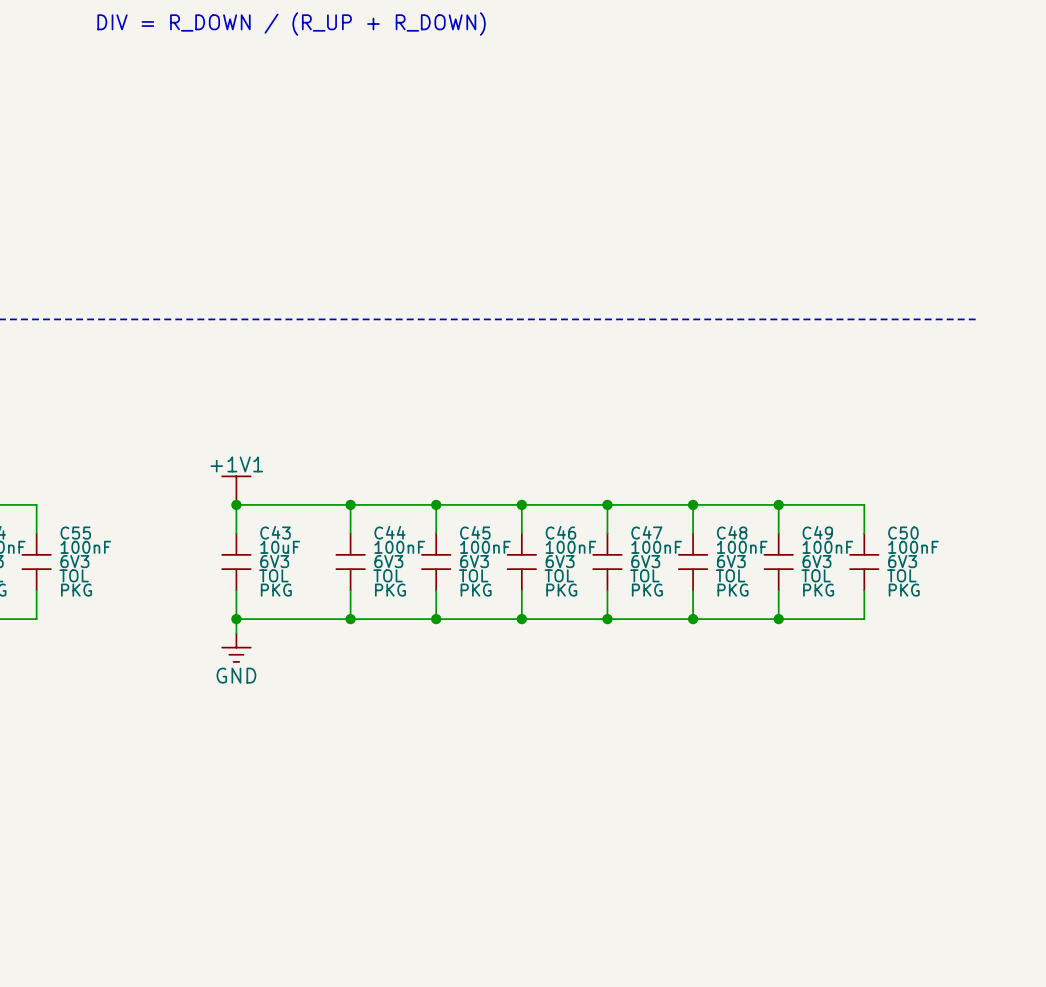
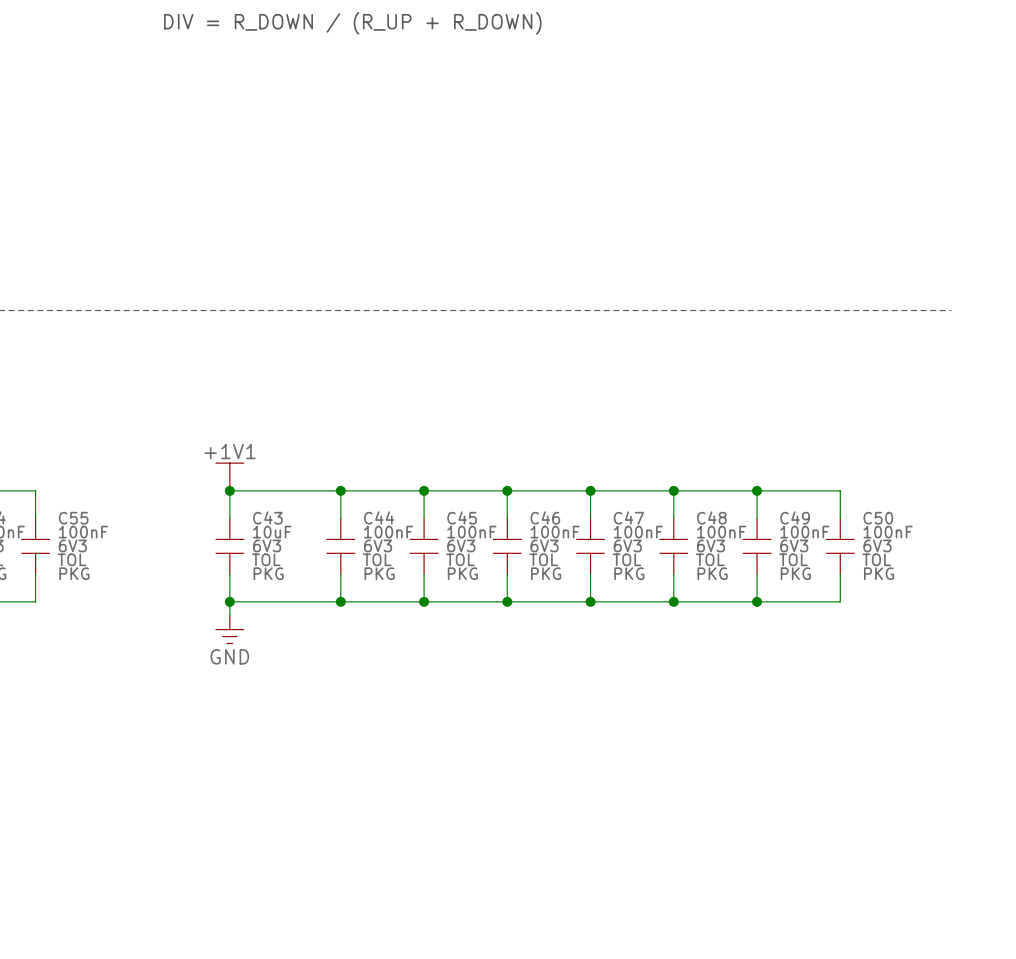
text position: DIV = R_DOWN / (R_UP + R_DOWN) (291, 24) -> DIV = R_DOWN / (R_UP + R_DOWN) (352, 23)

